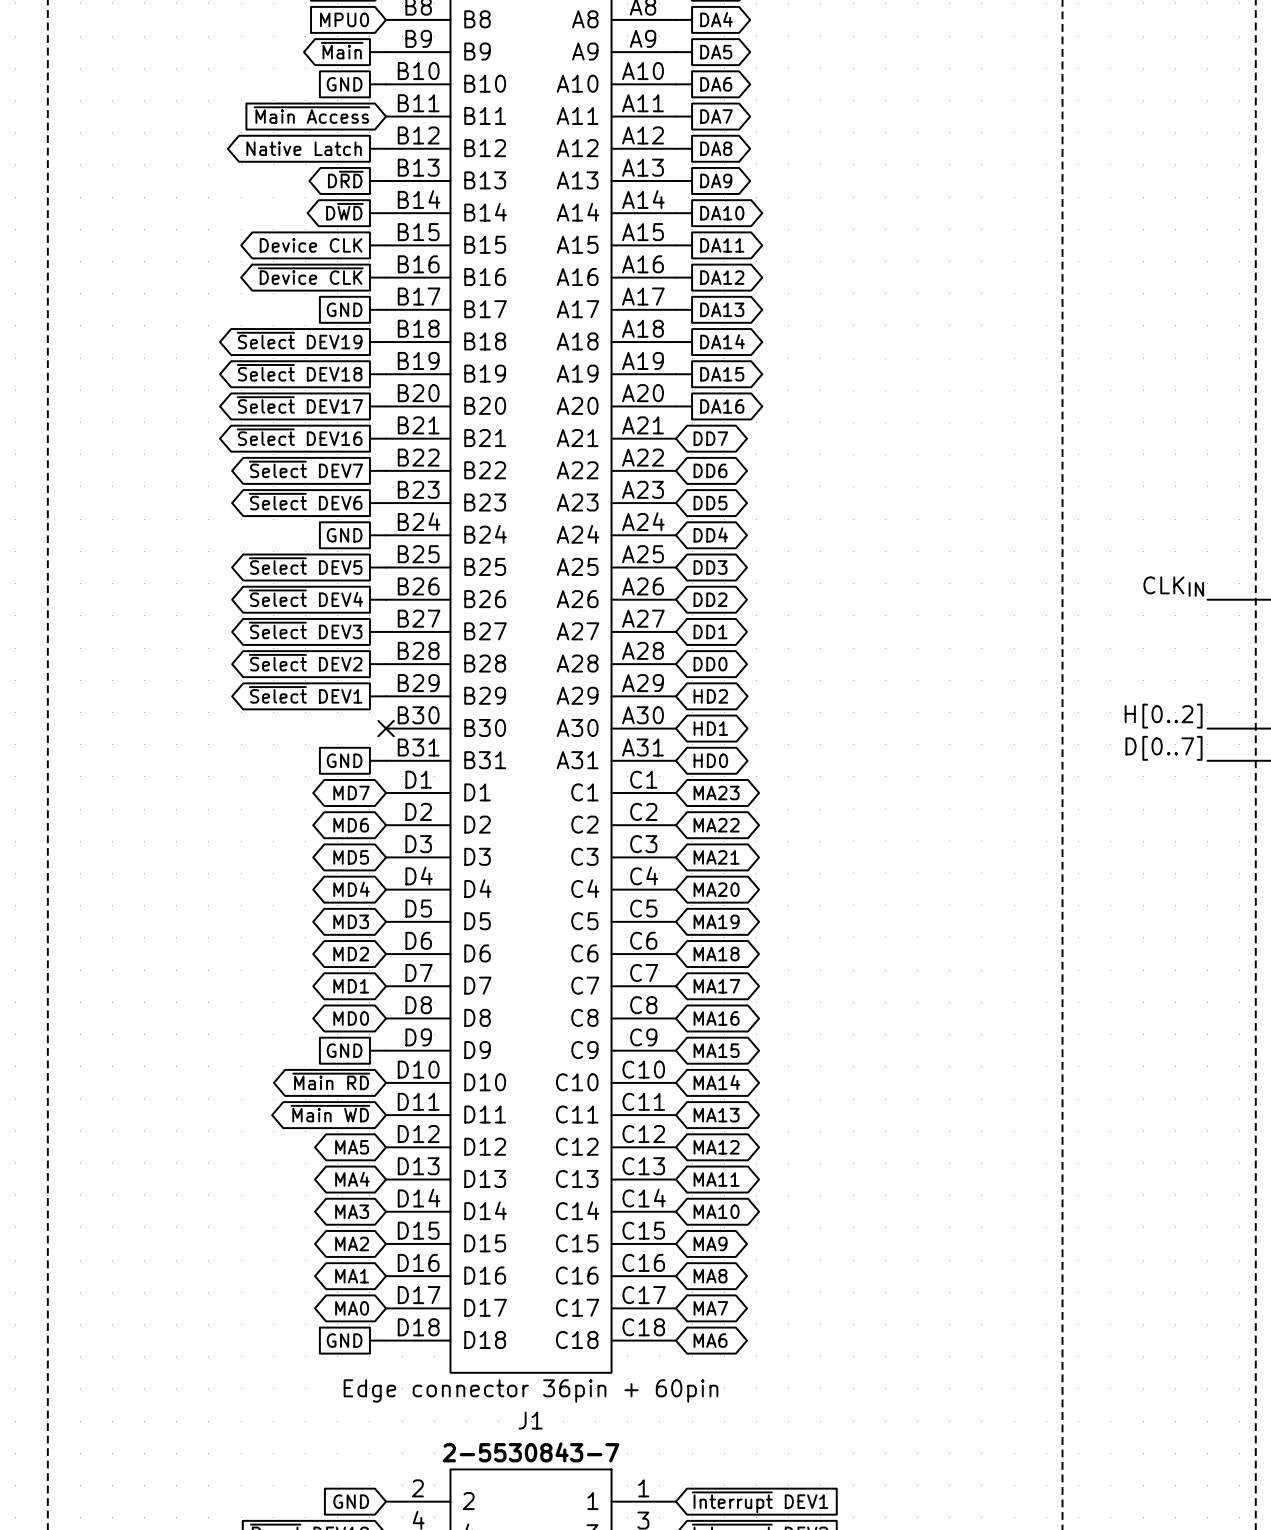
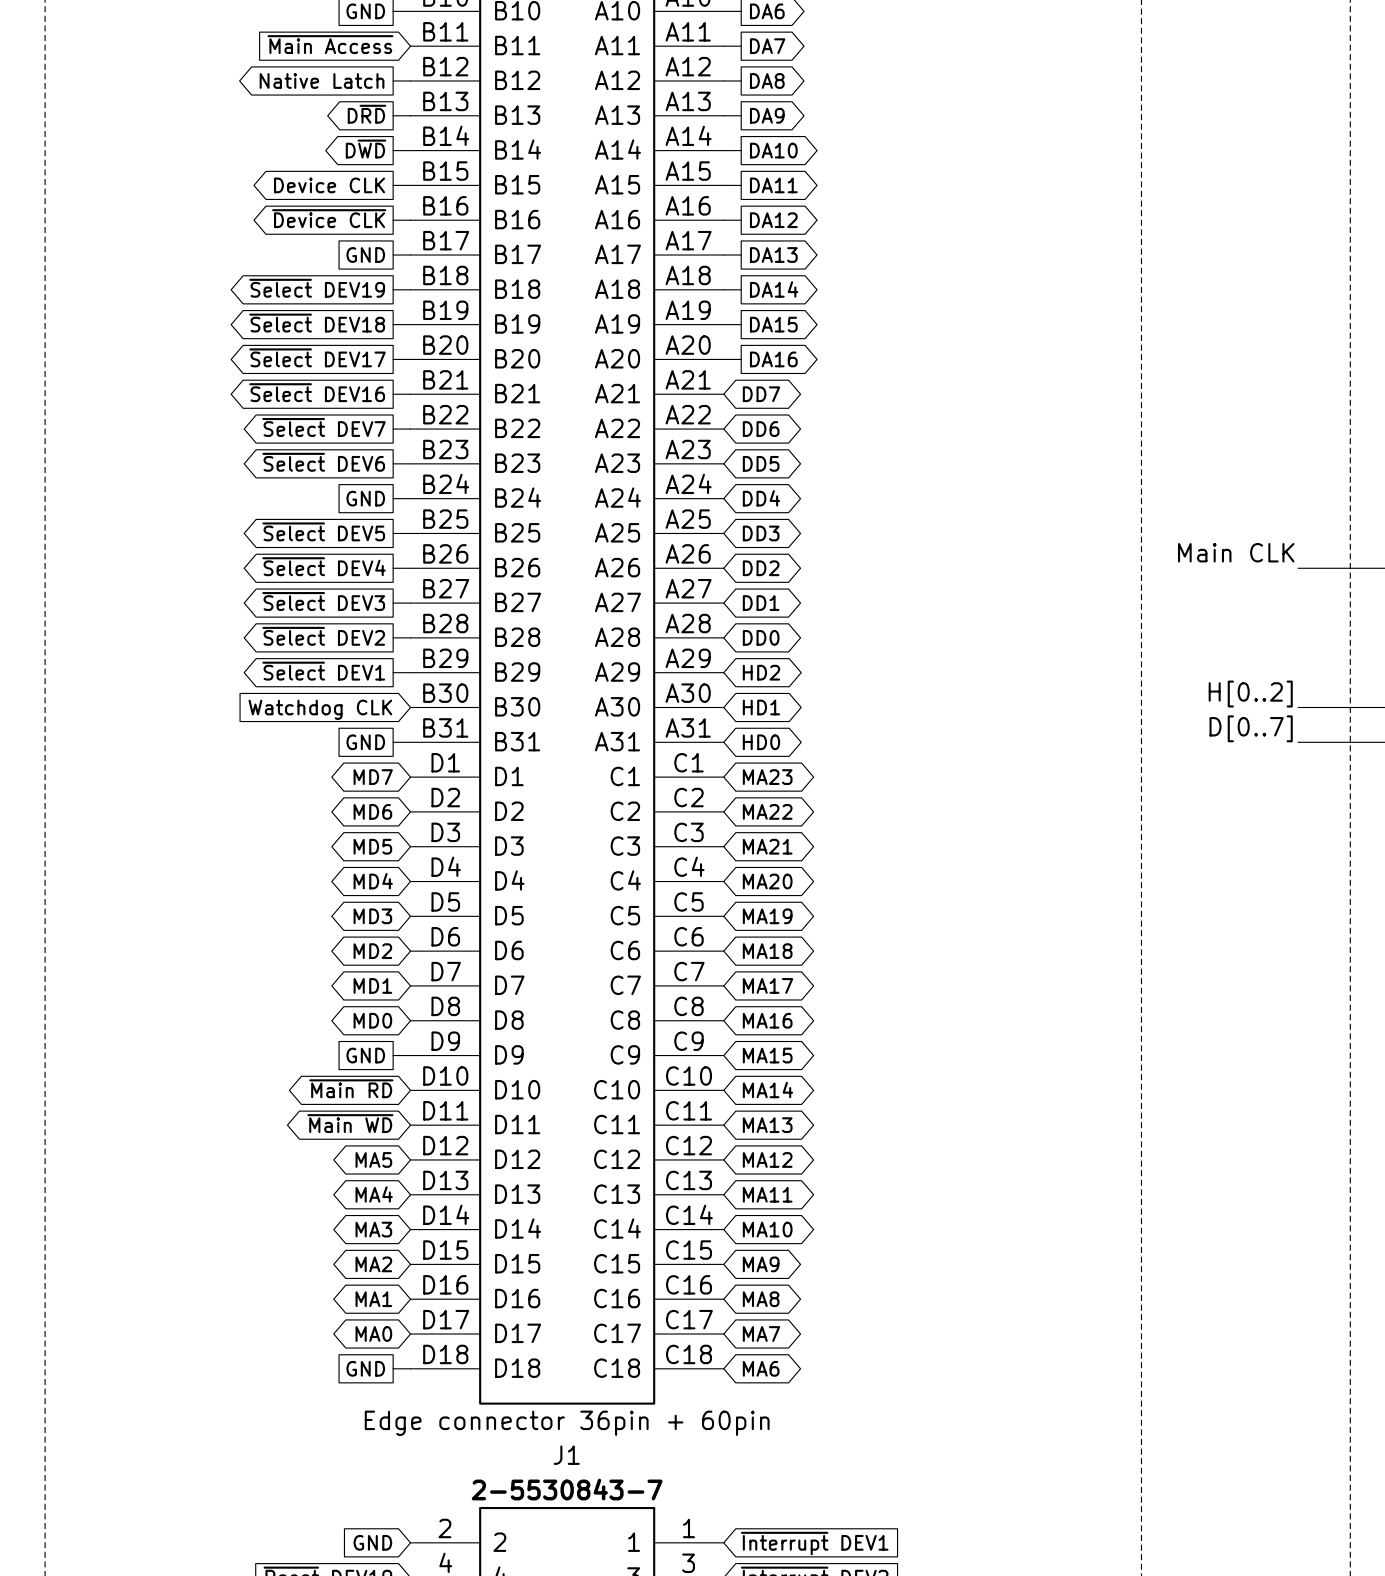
label: CLKIN (1173, 586) -> Main CLK (1236, 552)
no-connect mark: (386, 728) -> none
global label: none -> Watchdog CLK (320, 709)

